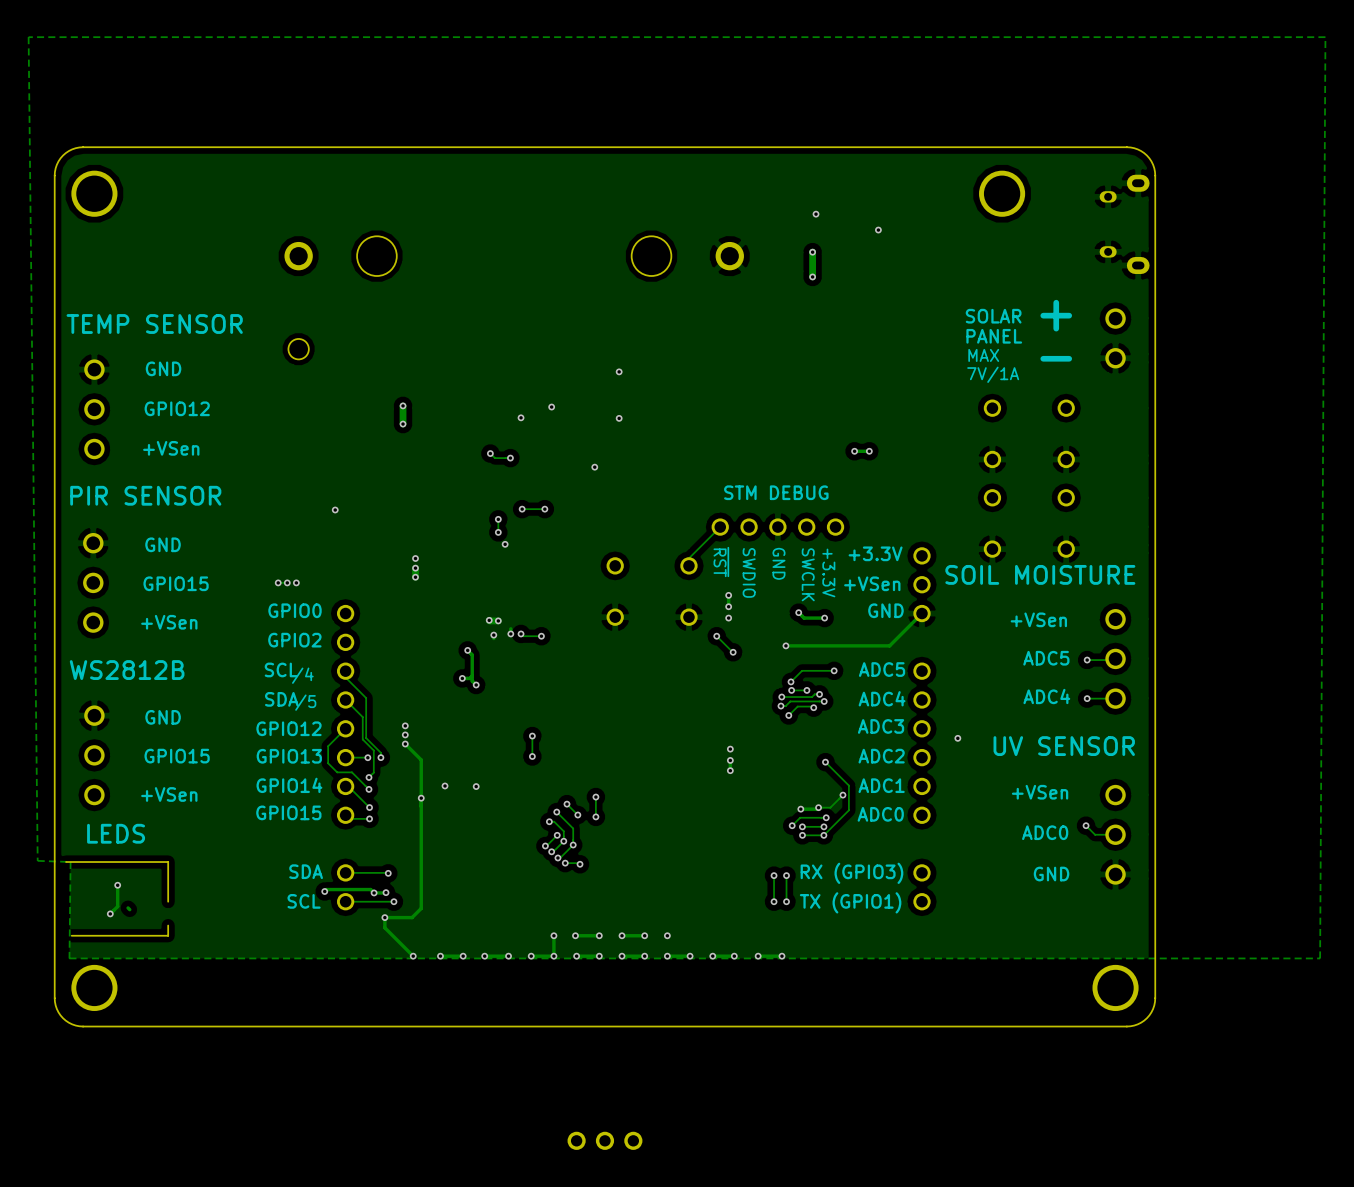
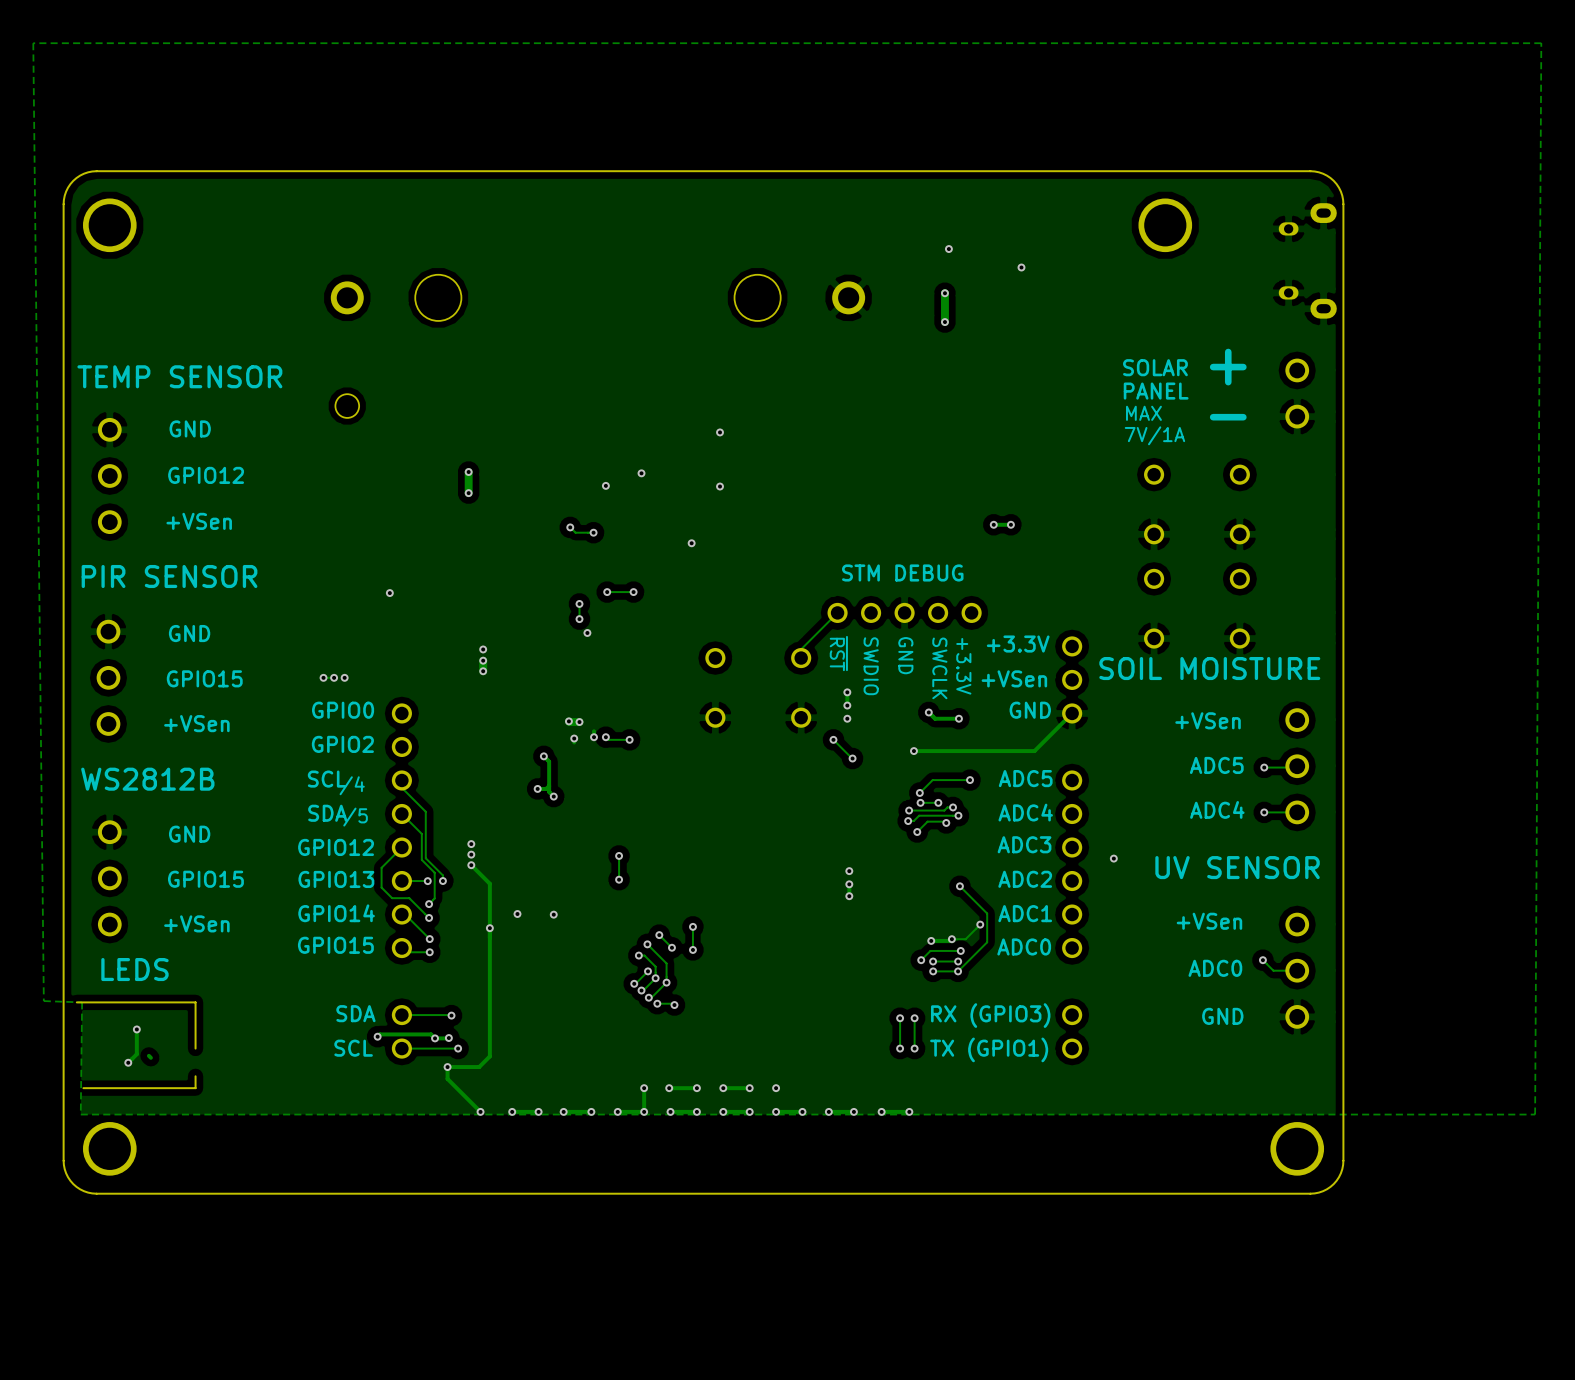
part: (604, 1140) -> none

